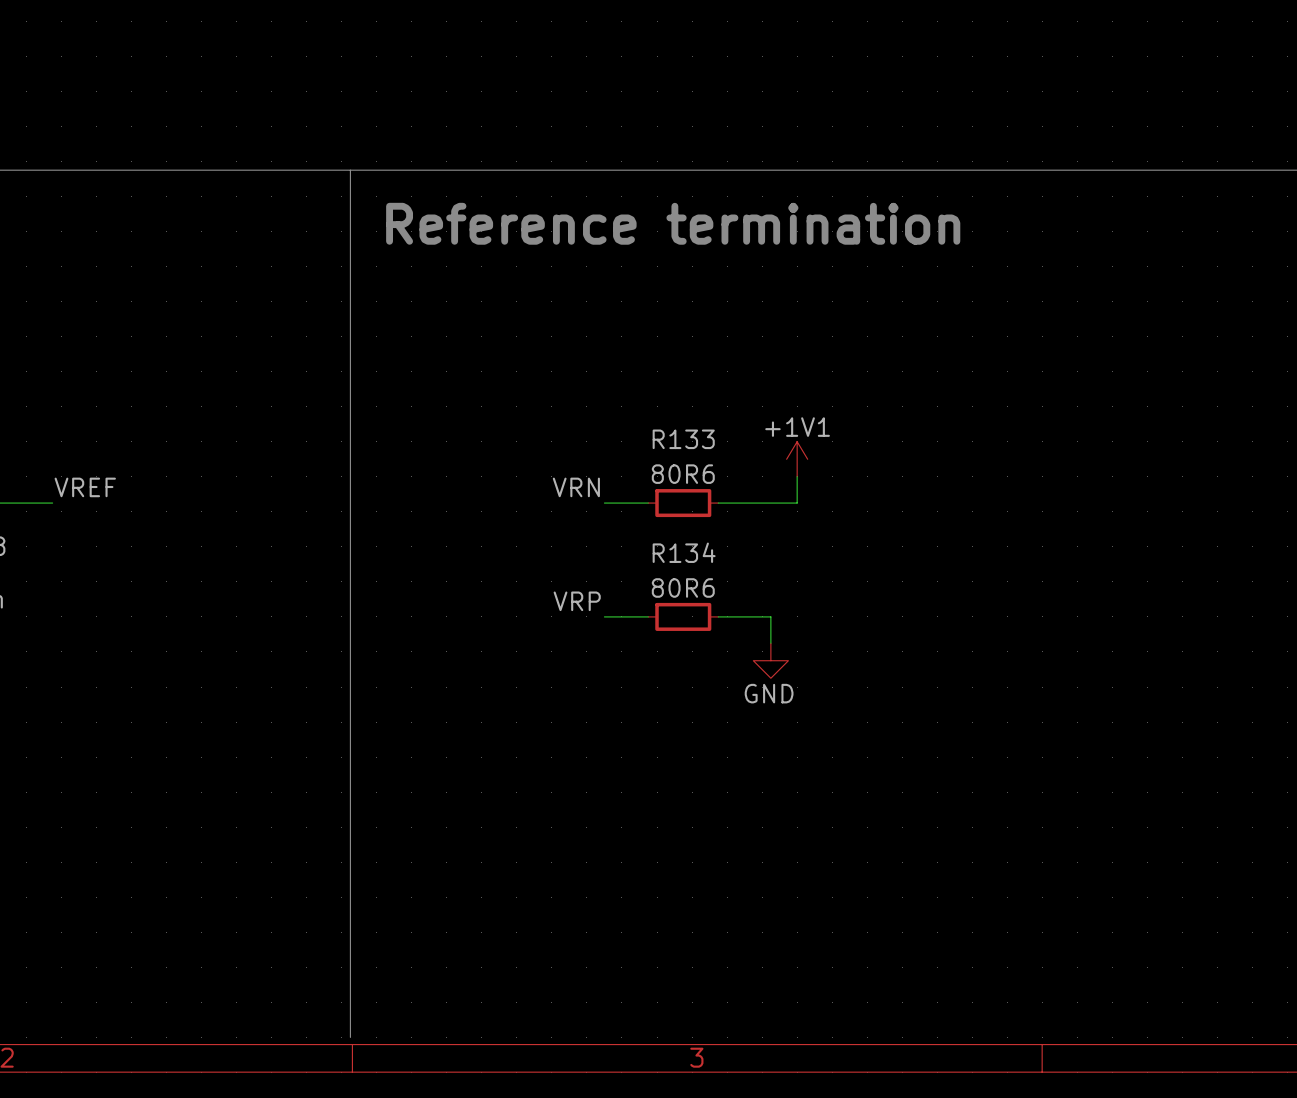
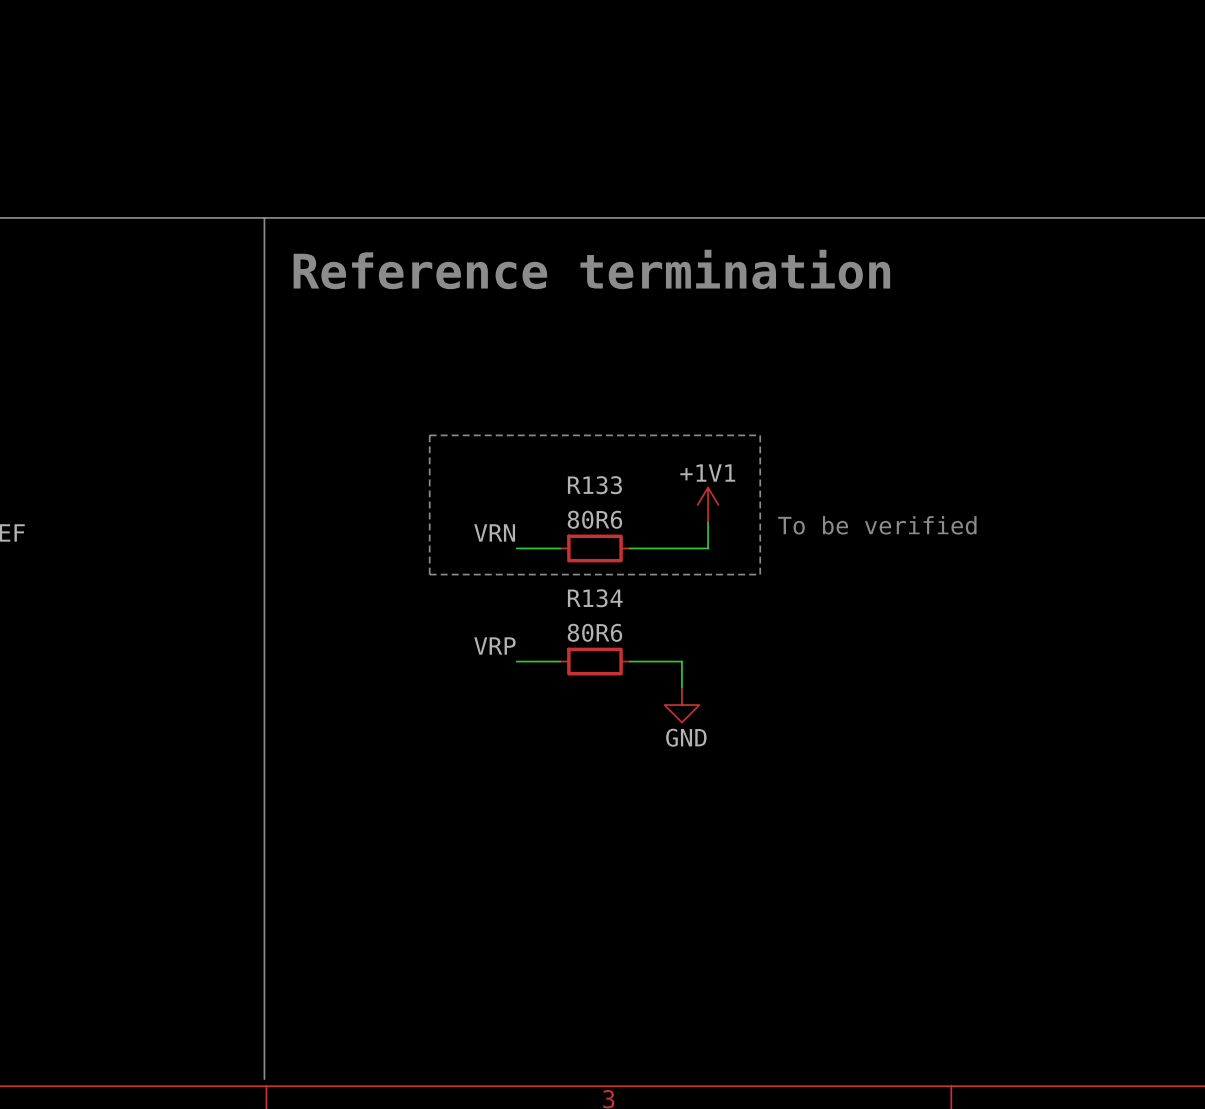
line: none -> (429, 435) (760, 435) (760, 574) (429, 574) (429, 435)
text: none -> To be verified (877, 525)

